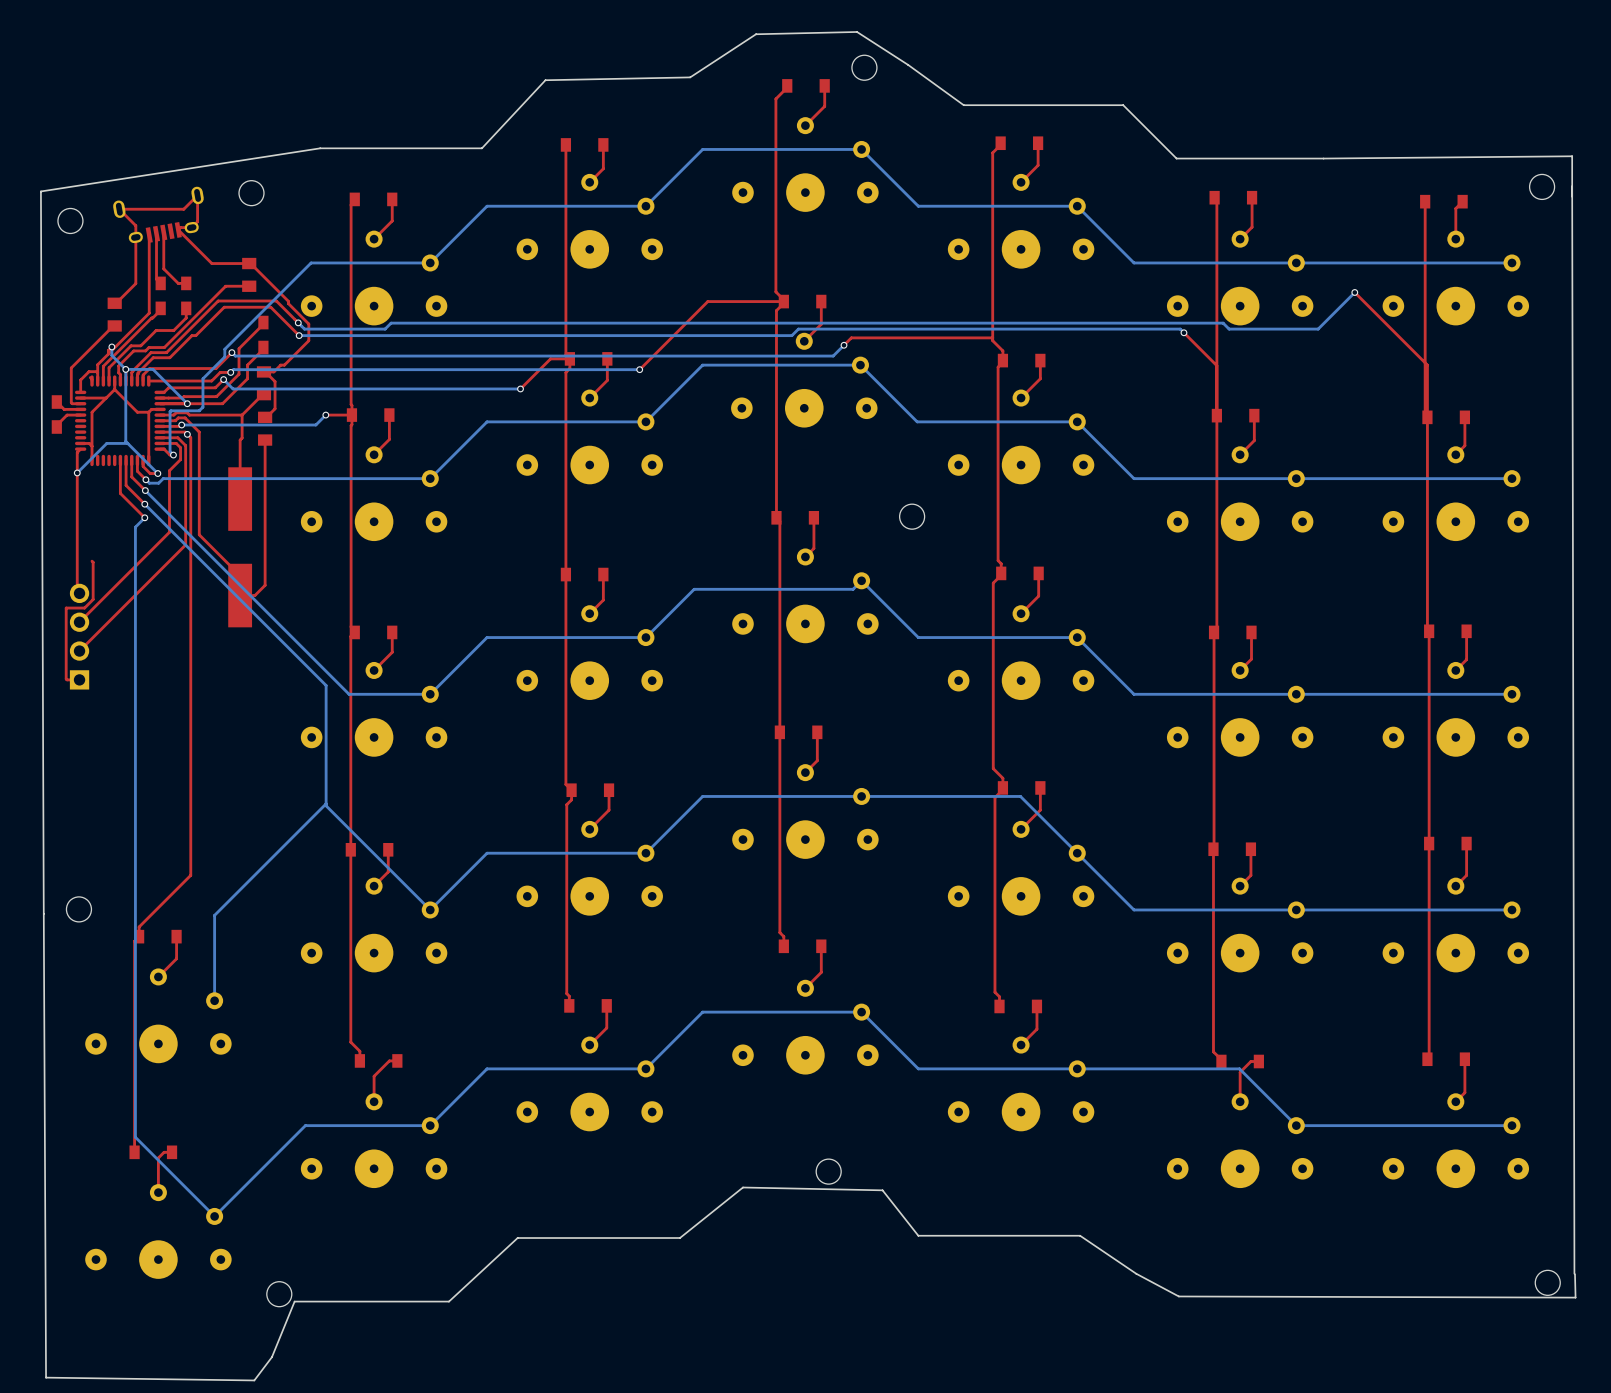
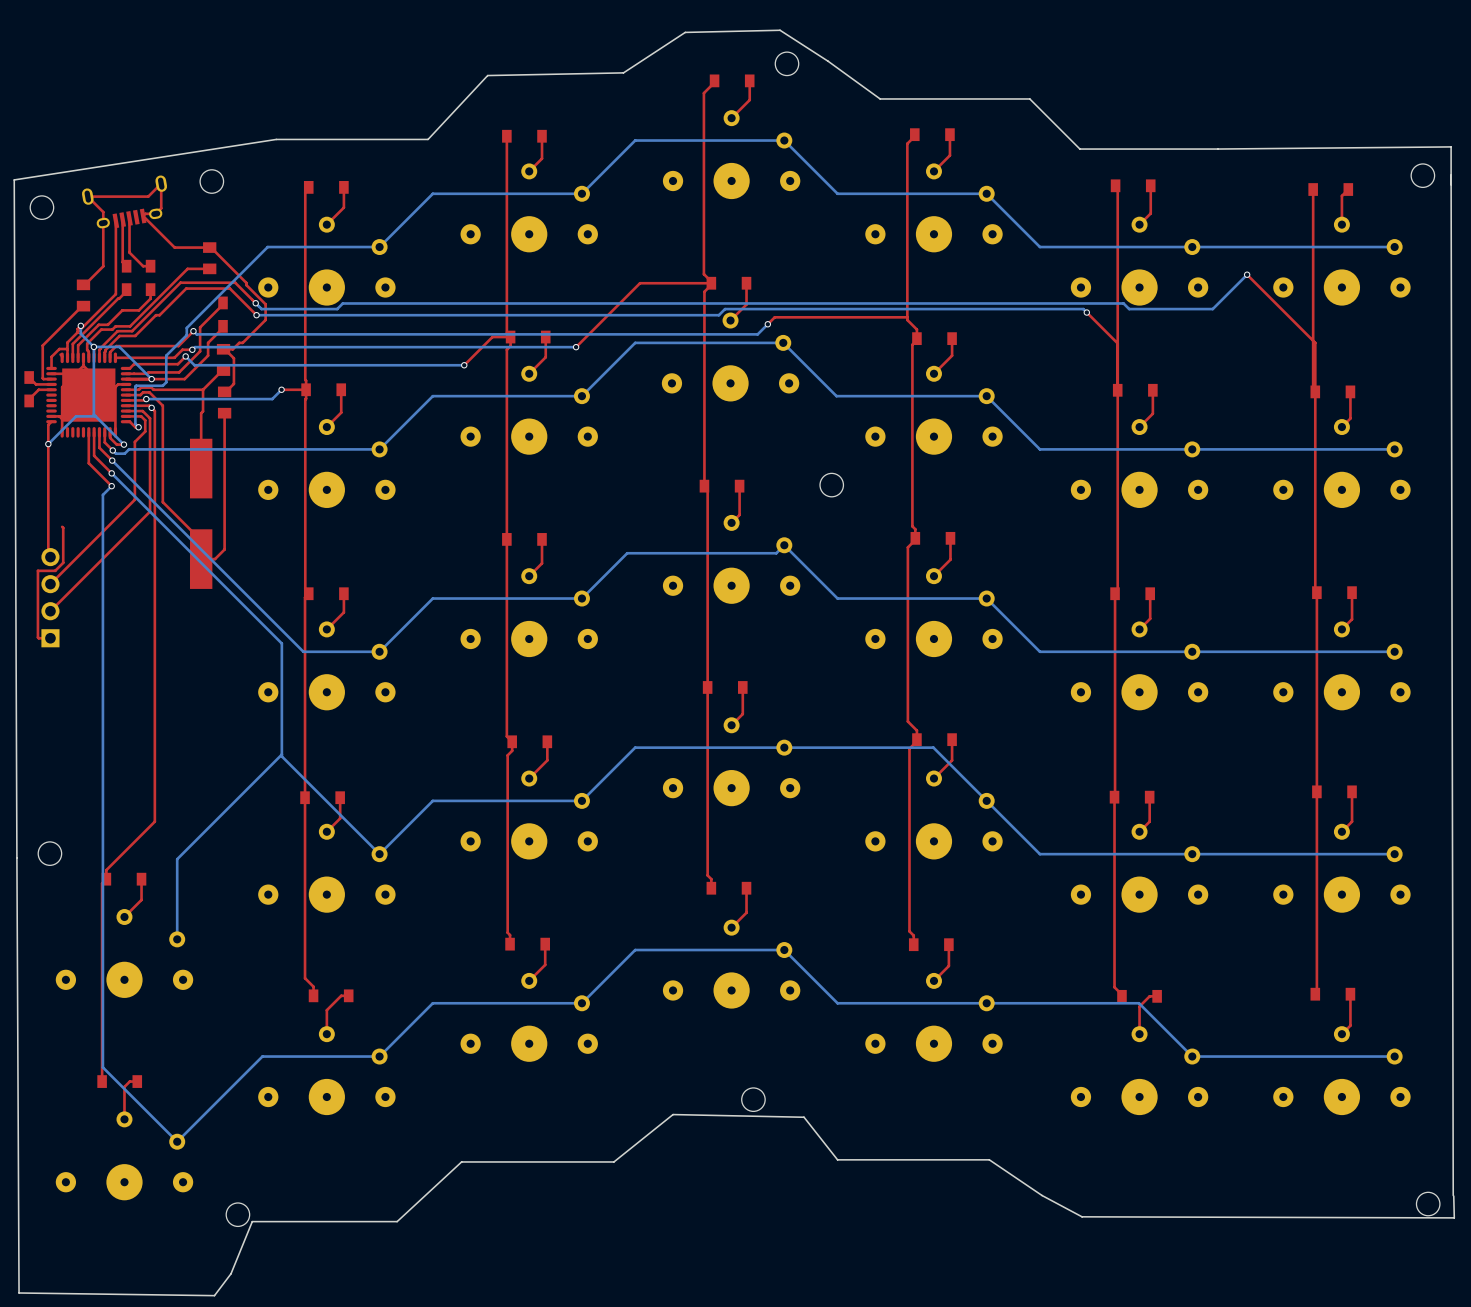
part footprint: [74, 375, 166, 467] -> [46, 352, 132, 438]

